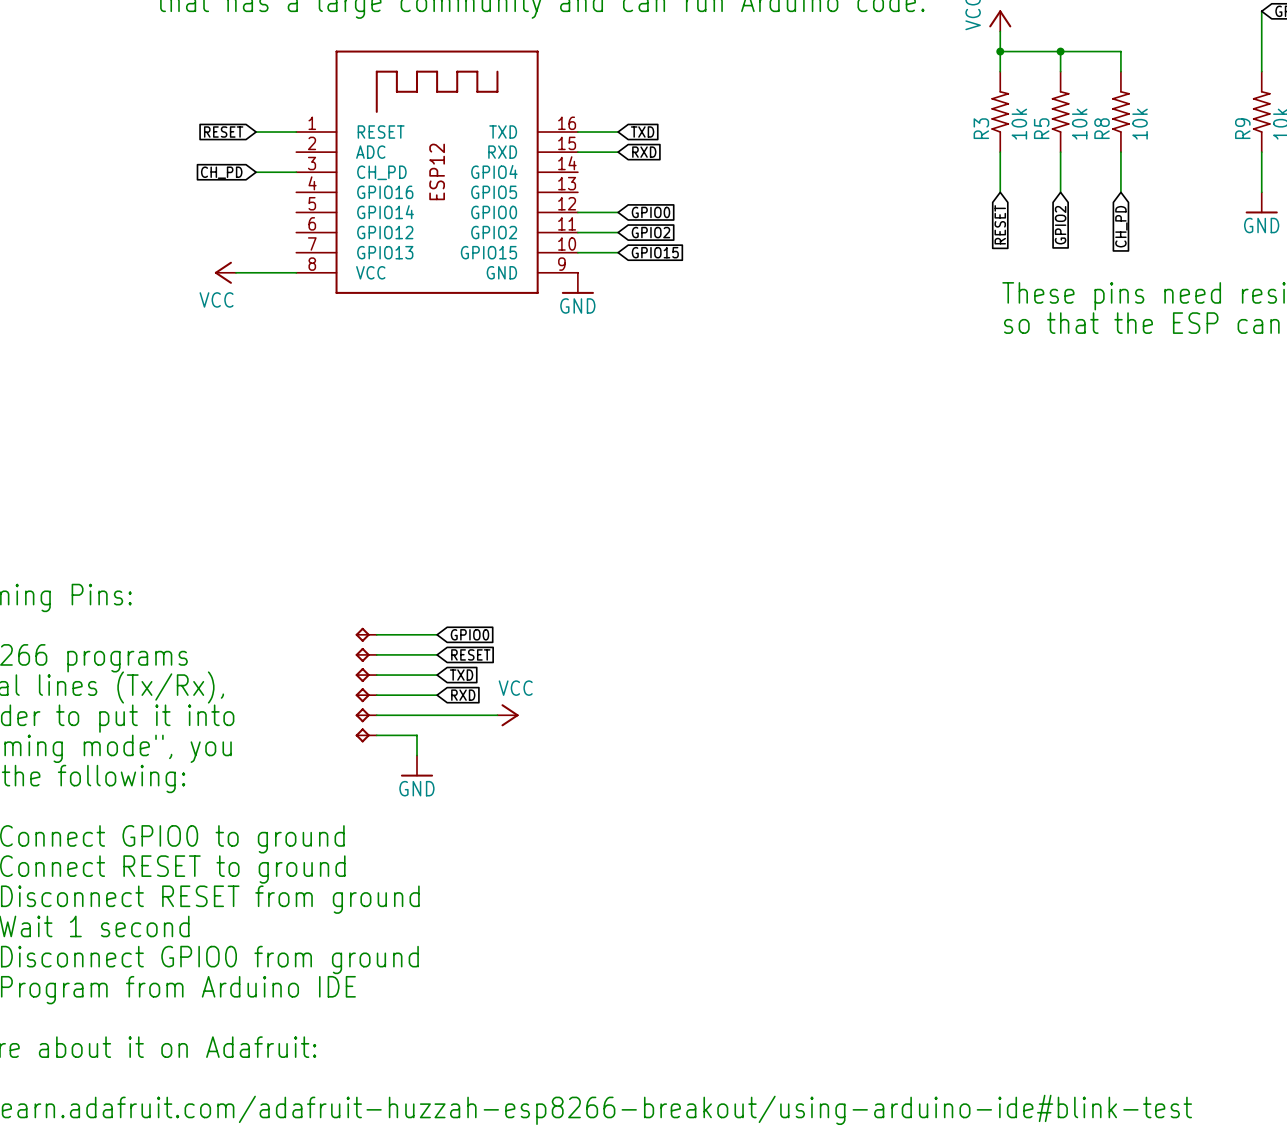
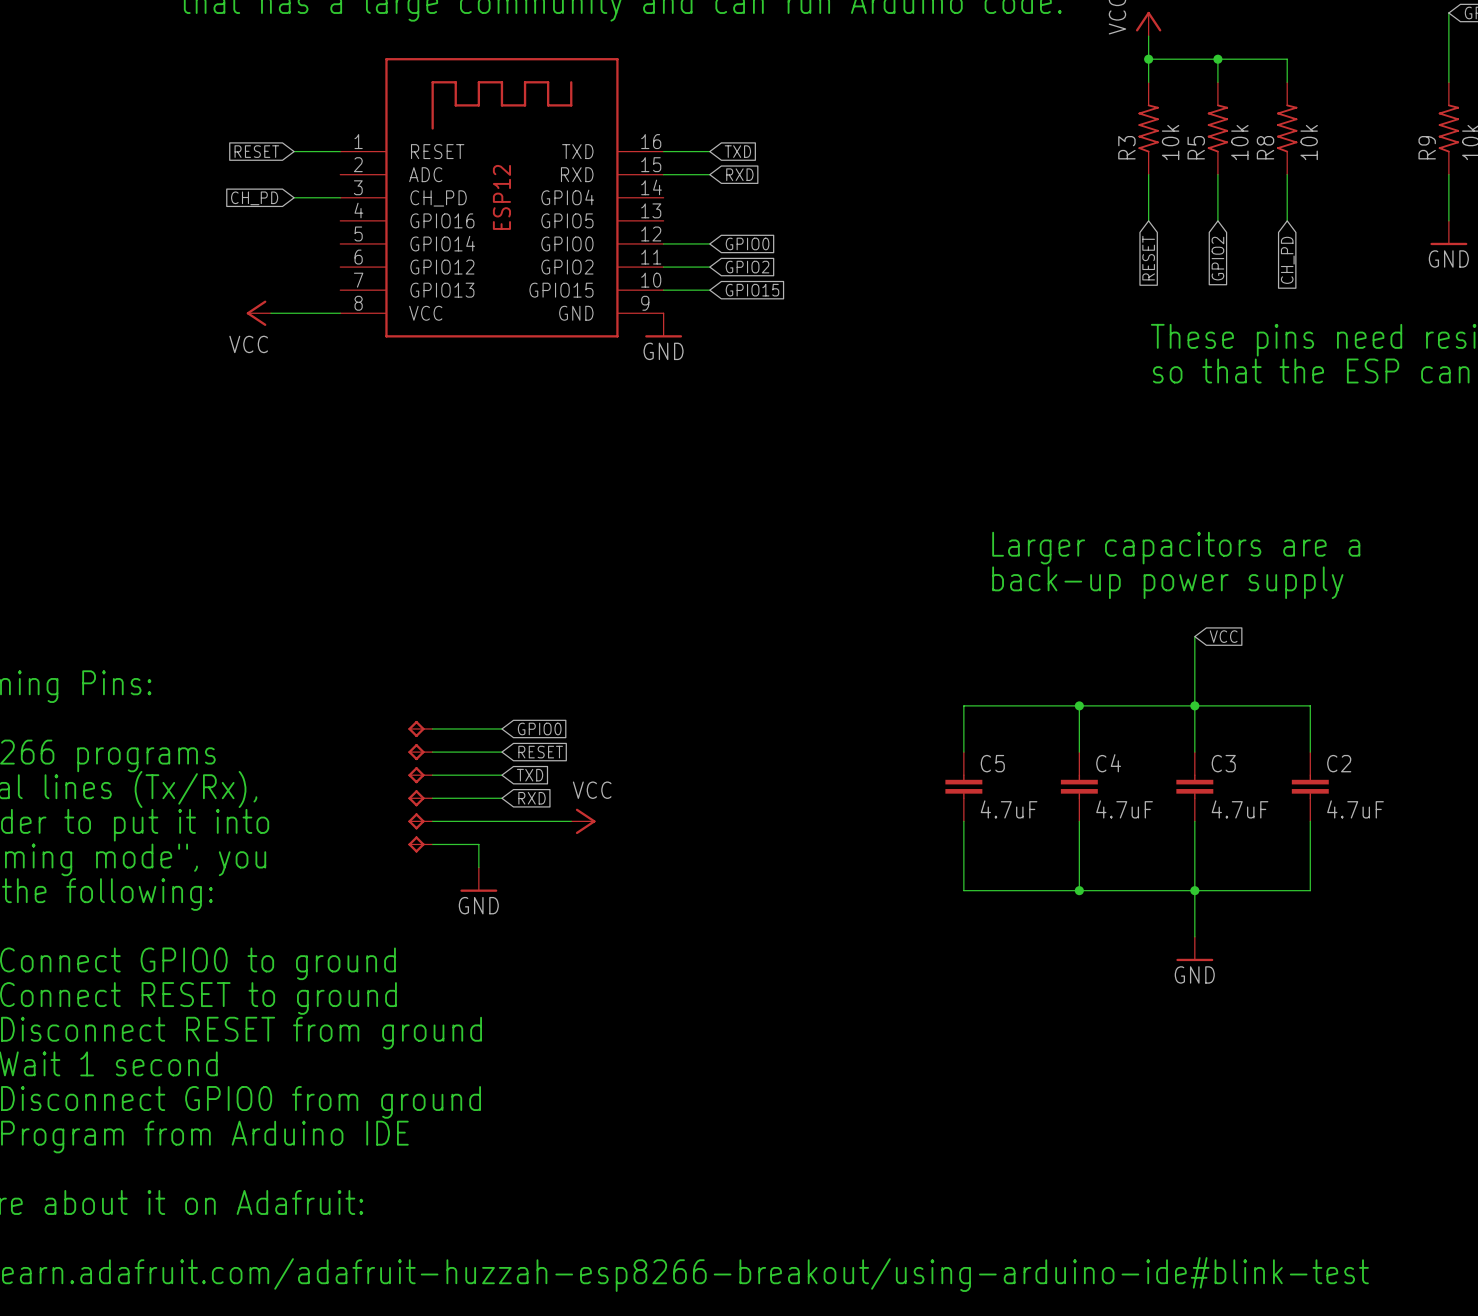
text: none -> Larger capacitors are a (1176, 548)
text: none -> back-up power supply (1167, 582)
wire: none -> (1194, 636) (1194, 752)
global label: none -> VCC (1223, 636)
wire: none -> (1079, 705) (1079, 752)
junction: none -> (1079, 705)
junction: none -> (1194, 705)
wire: none -> (963, 752) (963, 705) (1310, 705) (1310, 752)
C5: none -> 4.7uF (963, 786)
C4: none -> 4.7uF (1079, 786)
C3: none -> 4.7uF (1194, 786)
C2: none -> 4.7uF (1310, 786)
wire: none -> (963, 821) (963, 890) (1310, 890) (1310, 821)
wire: none -> (1079, 821) (1079, 890)
wire: none -> (1194, 821) (1194, 936)
junction: none -> (1079, 890)
junction: none -> (1194, 890)
power symbol: none -> GND (1194, 948)

